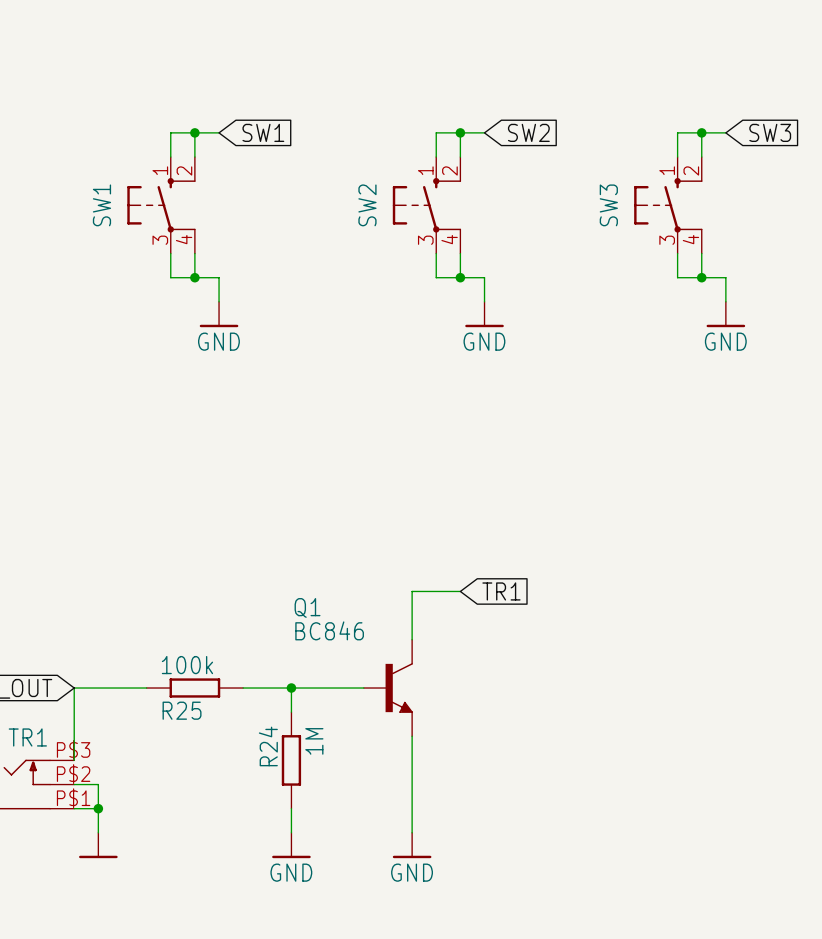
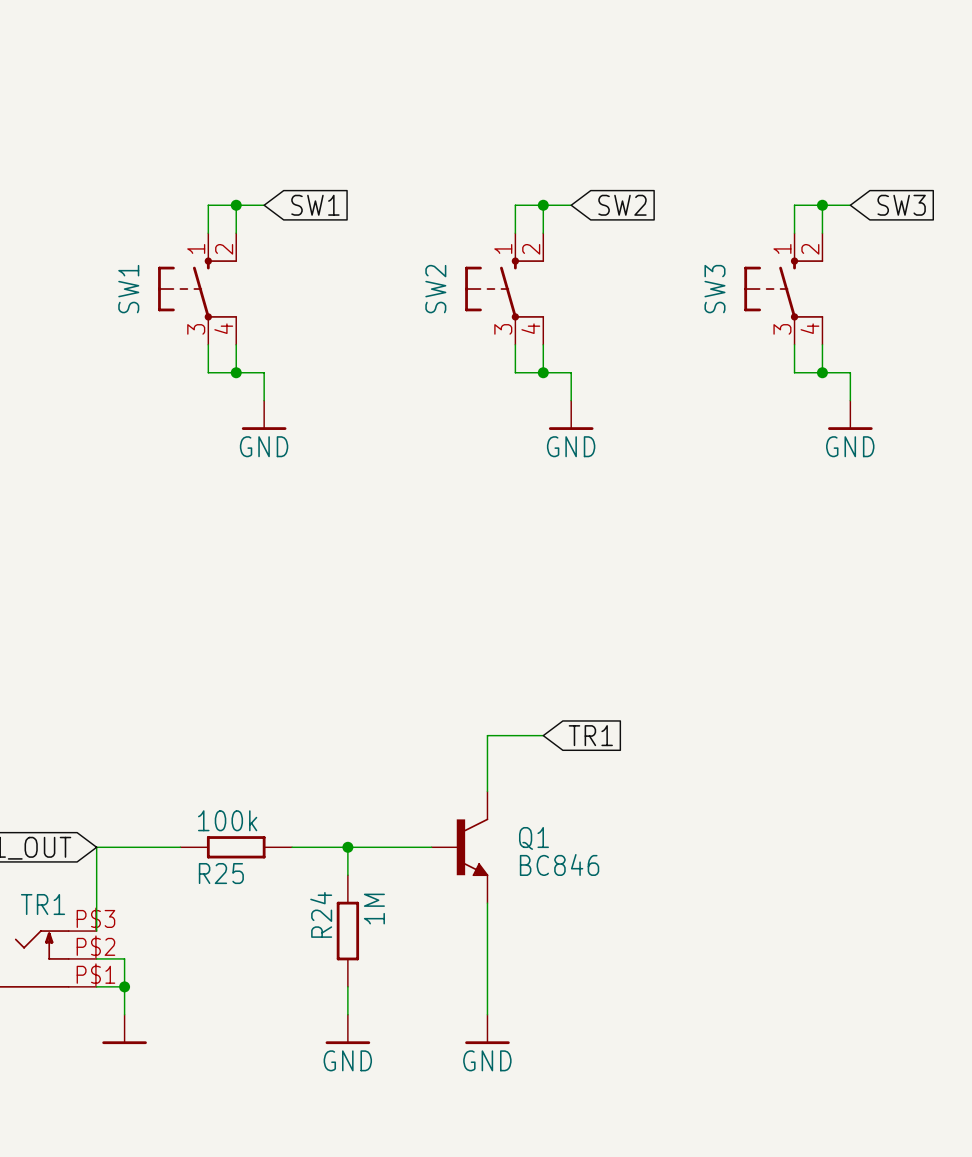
Q1 name position: Q1 (307, 607) -> Q1 (534, 838)
Q1 value position: BC846 (329, 630) -> BC846 (559, 864)

